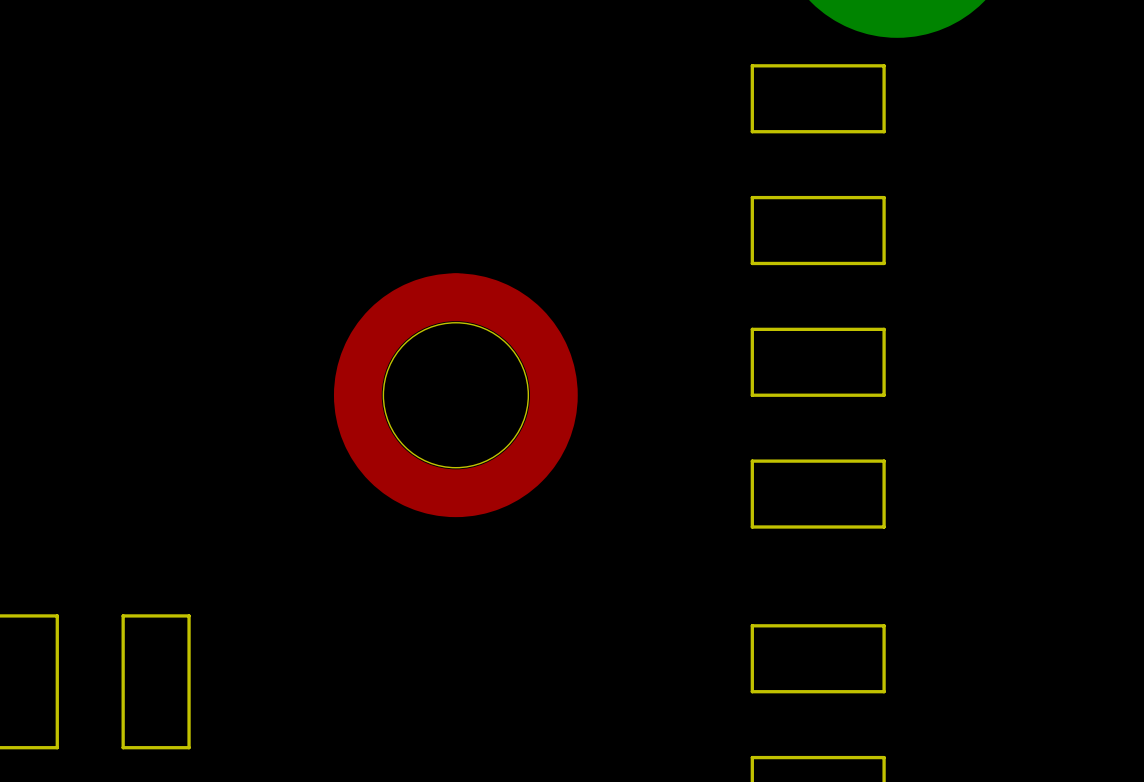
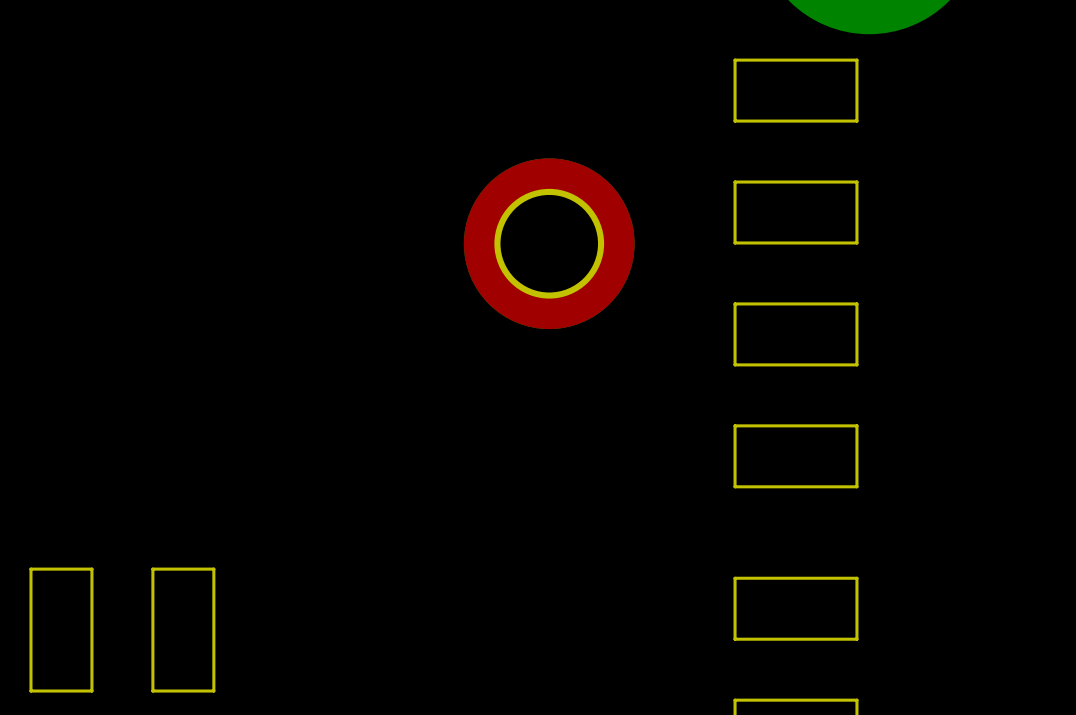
part: none -> (549, 243)
part: (455, 395) -> none

